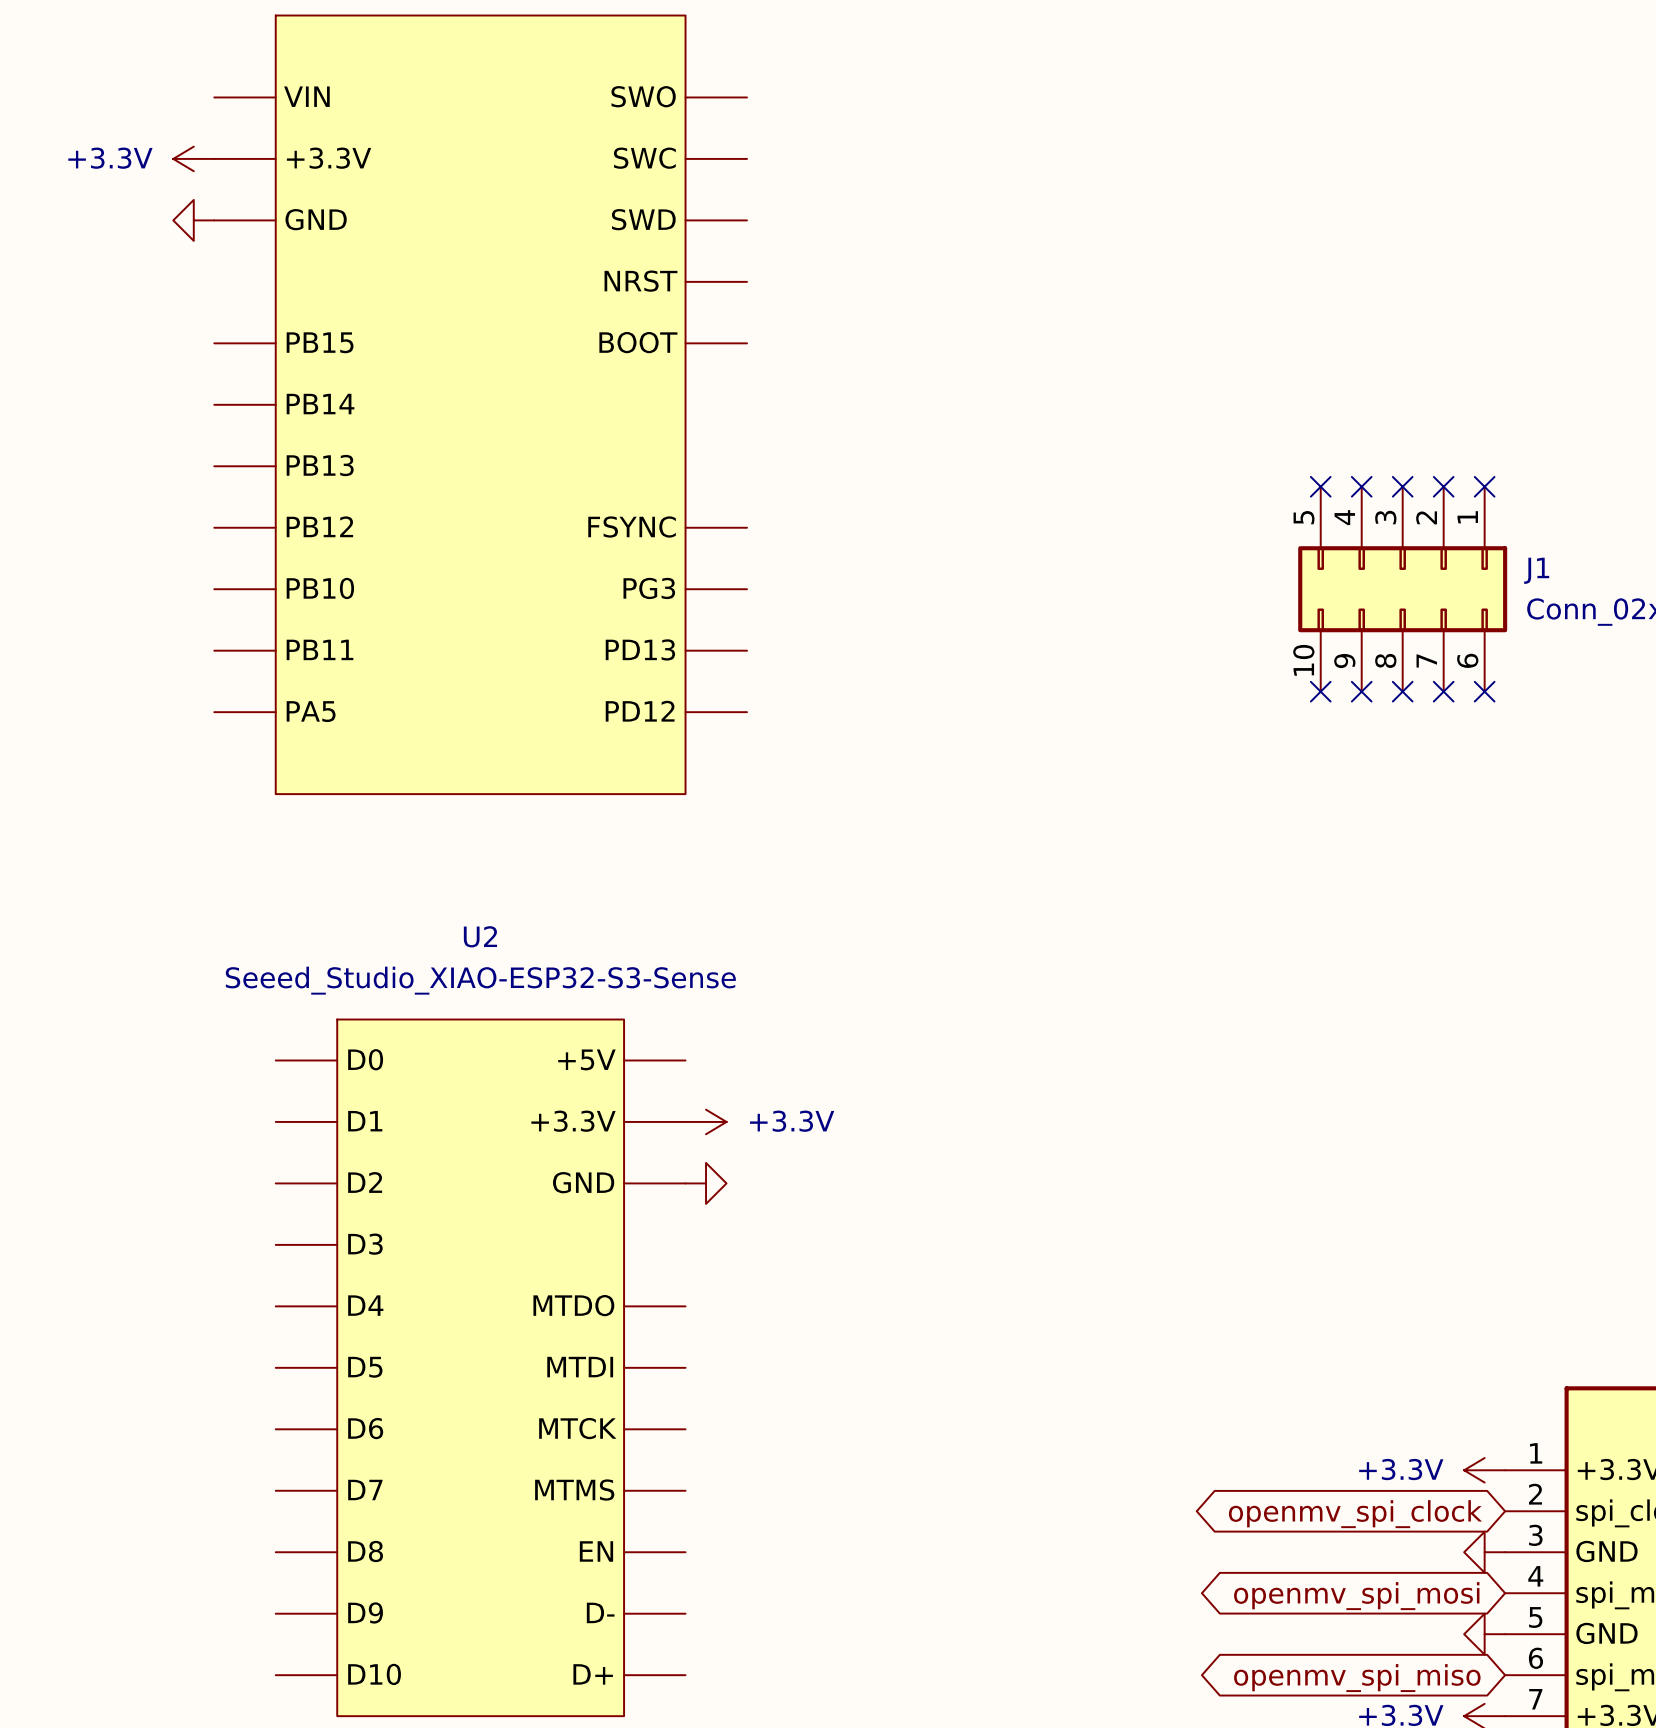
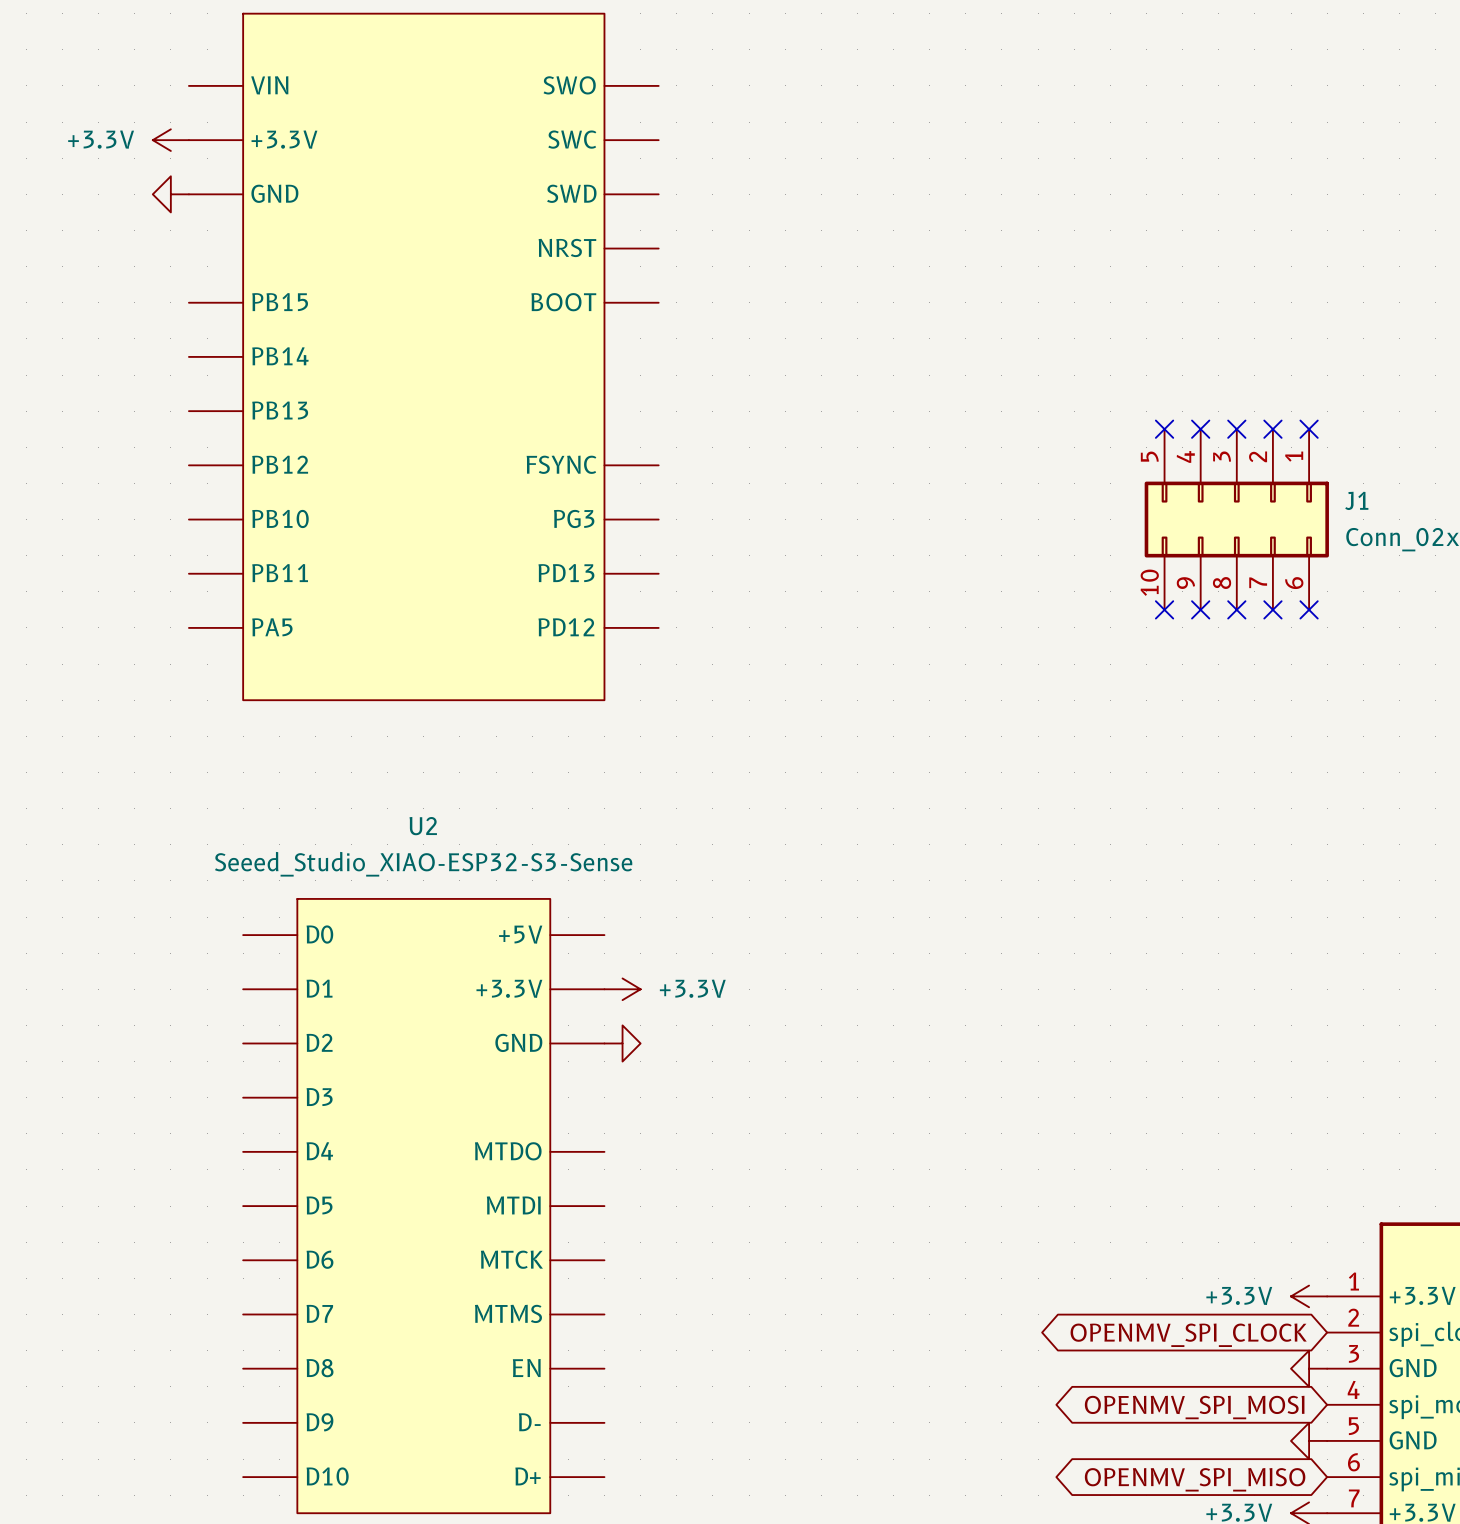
global label: openmv_spi_clock (1355, 1514) -> OPENMV_SPI_CLOCK (1188, 1335)
global label: openmv_spi_mosi (1356, 1596) -> OPENMV_SPI_MOSI (1194, 1407)
global label: openmv_spi_miso (1357, 1678) -> OPENMV_SPI_MISO (1195, 1479)

